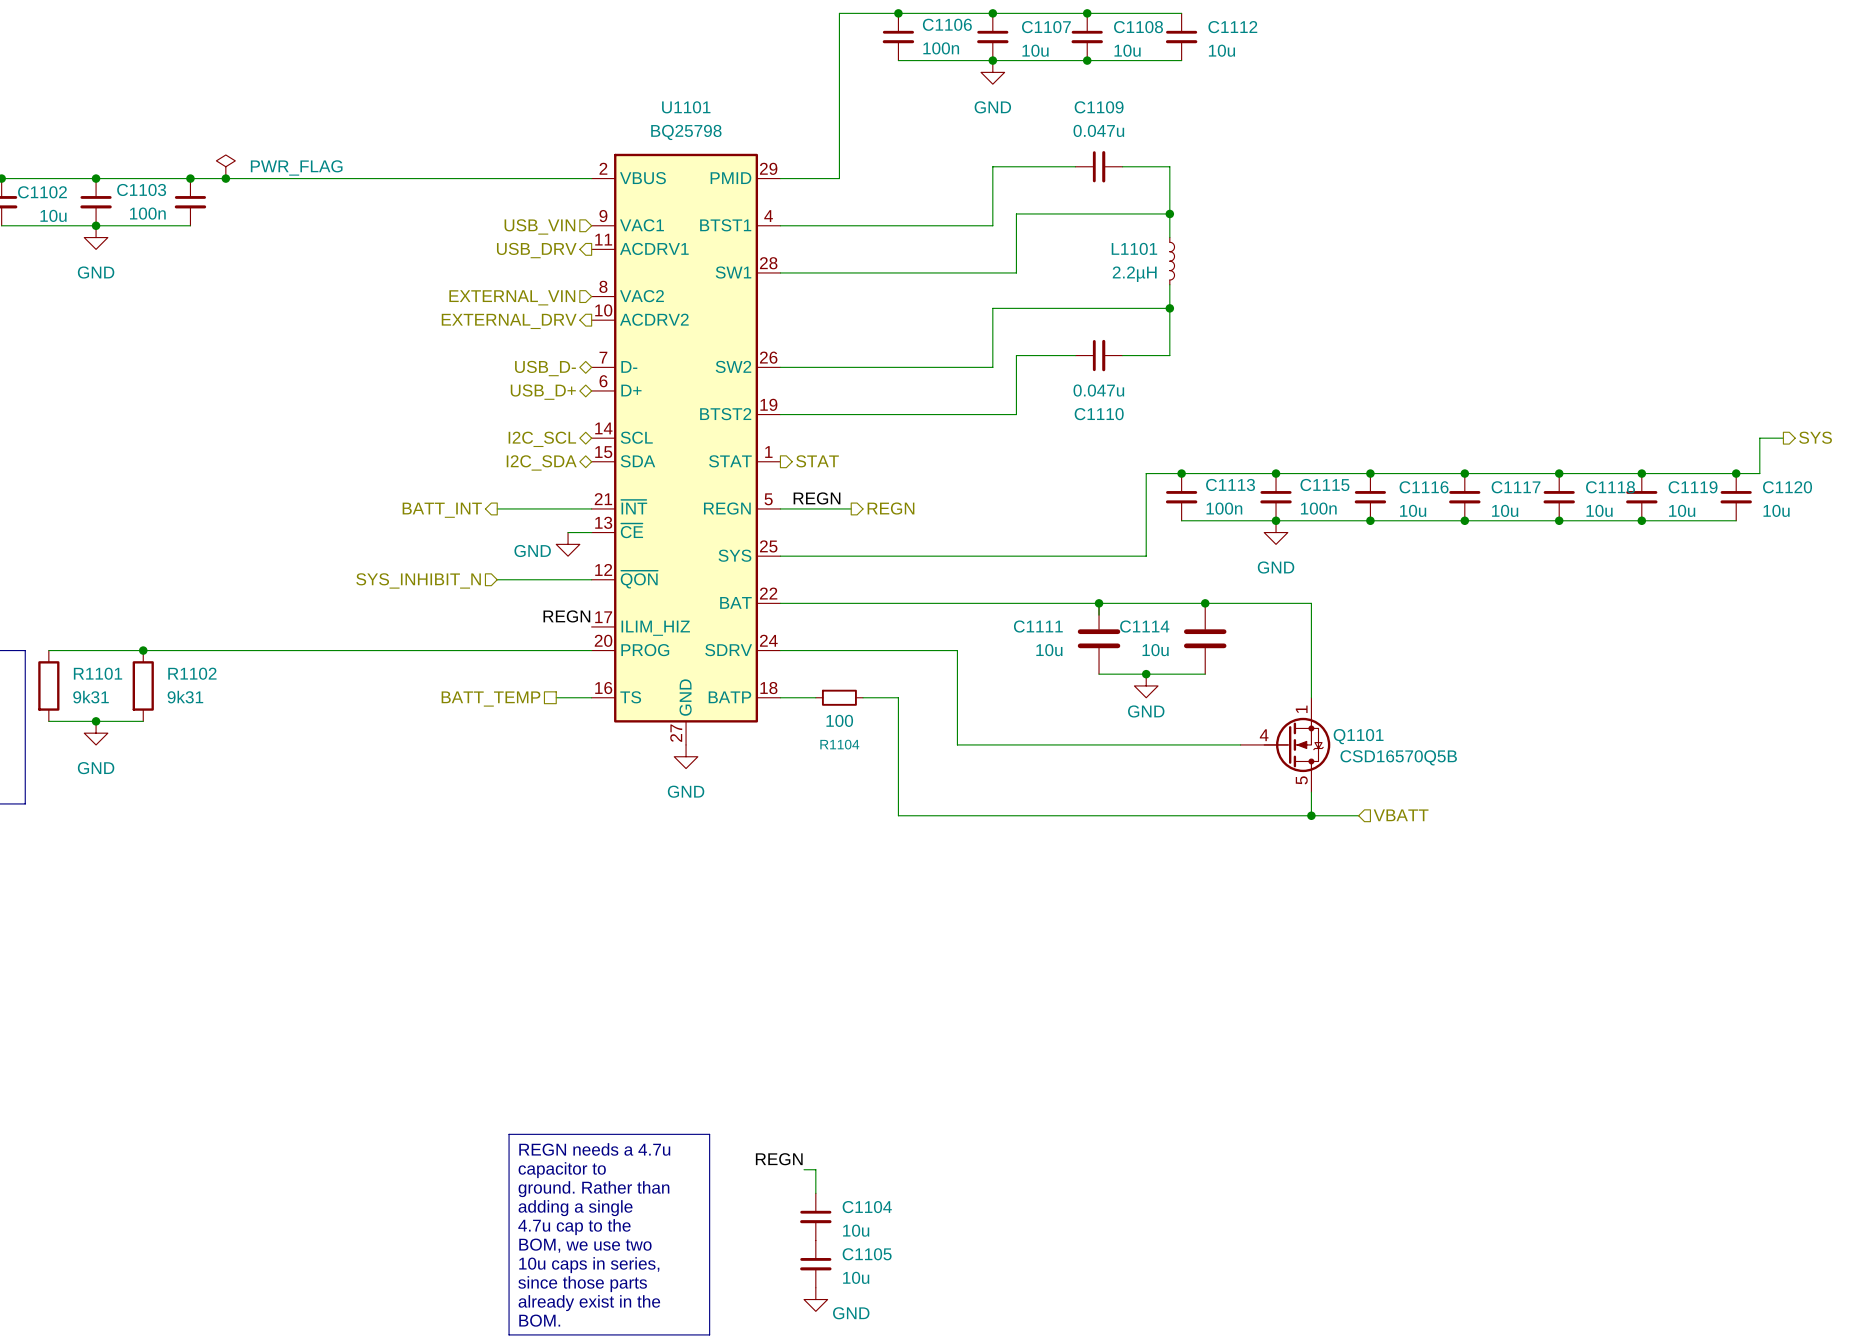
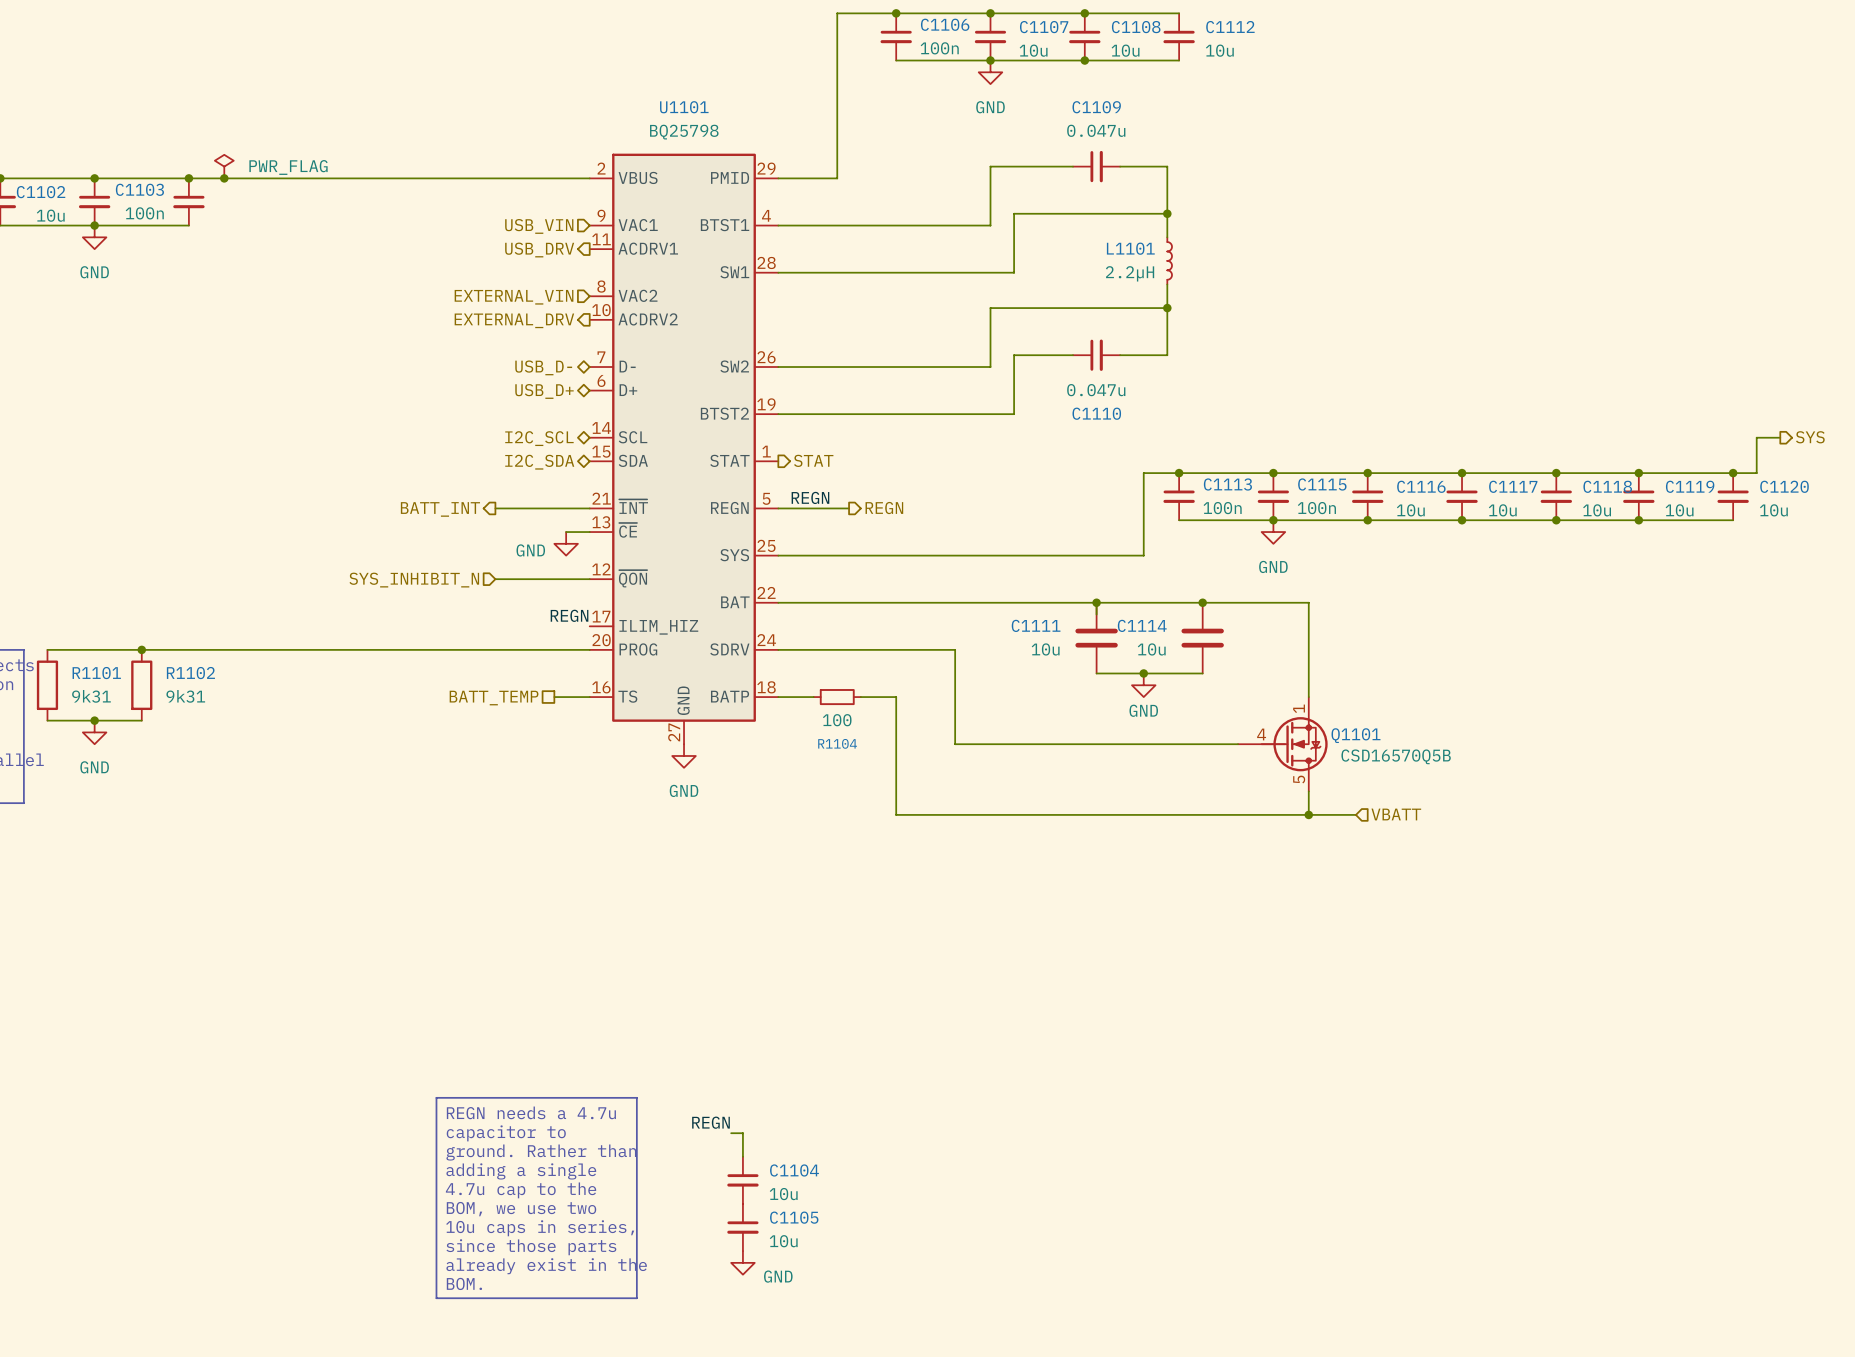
line: (509, 1134) (709, 1134) (709, 1334) (509, 1334) (509, 1134) -> (436, 1097) (636, 1097) (636, 1298) (436, 1298) (436, 1097)
text position: REGN needs a 4.7u (594, 1149) -> REGN needs a 4.7u (531, 1112)
label position: REGN (779, 1159) -> REGN (710, 1122)
wire: (804, 1169) (815, 1169) (815, 1193) -> (731, 1133) (742, 1133) (742, 1156)
text position: capacitor to (562, 1170) -> capacitor to (506, 1133)
text position: ground. Rather than (593, 1189) -> ground. Rather than (541, 1152)
text position: adding a single (575, 1208) -> adding a single (521, 1171)
C1104 position: (815, 1216) -> (742, 1180)
text position: 4.7u cap to the (574, 1227) -> 4.7u cap to the (521, 1190)
text position: BOM, we use two (585, 1245) -> BOM, we use two (521, 1209)
C1105 position: (815, 1264) -> (742, 1227)
text position: 10u caps in series, (589, 1265) -> 10u caps in series, (540, 1228)
text position: since those parts (582, 1284) -> since those parts (531, 1247)
power symbol position: GND (815, 1299) -> GND (742, 1262)
text position: already exist in the (589, 1303) -> already exist in the (546, 1266)
text position: BOM. (539, 1320) -> BOM. (464, 1283)

